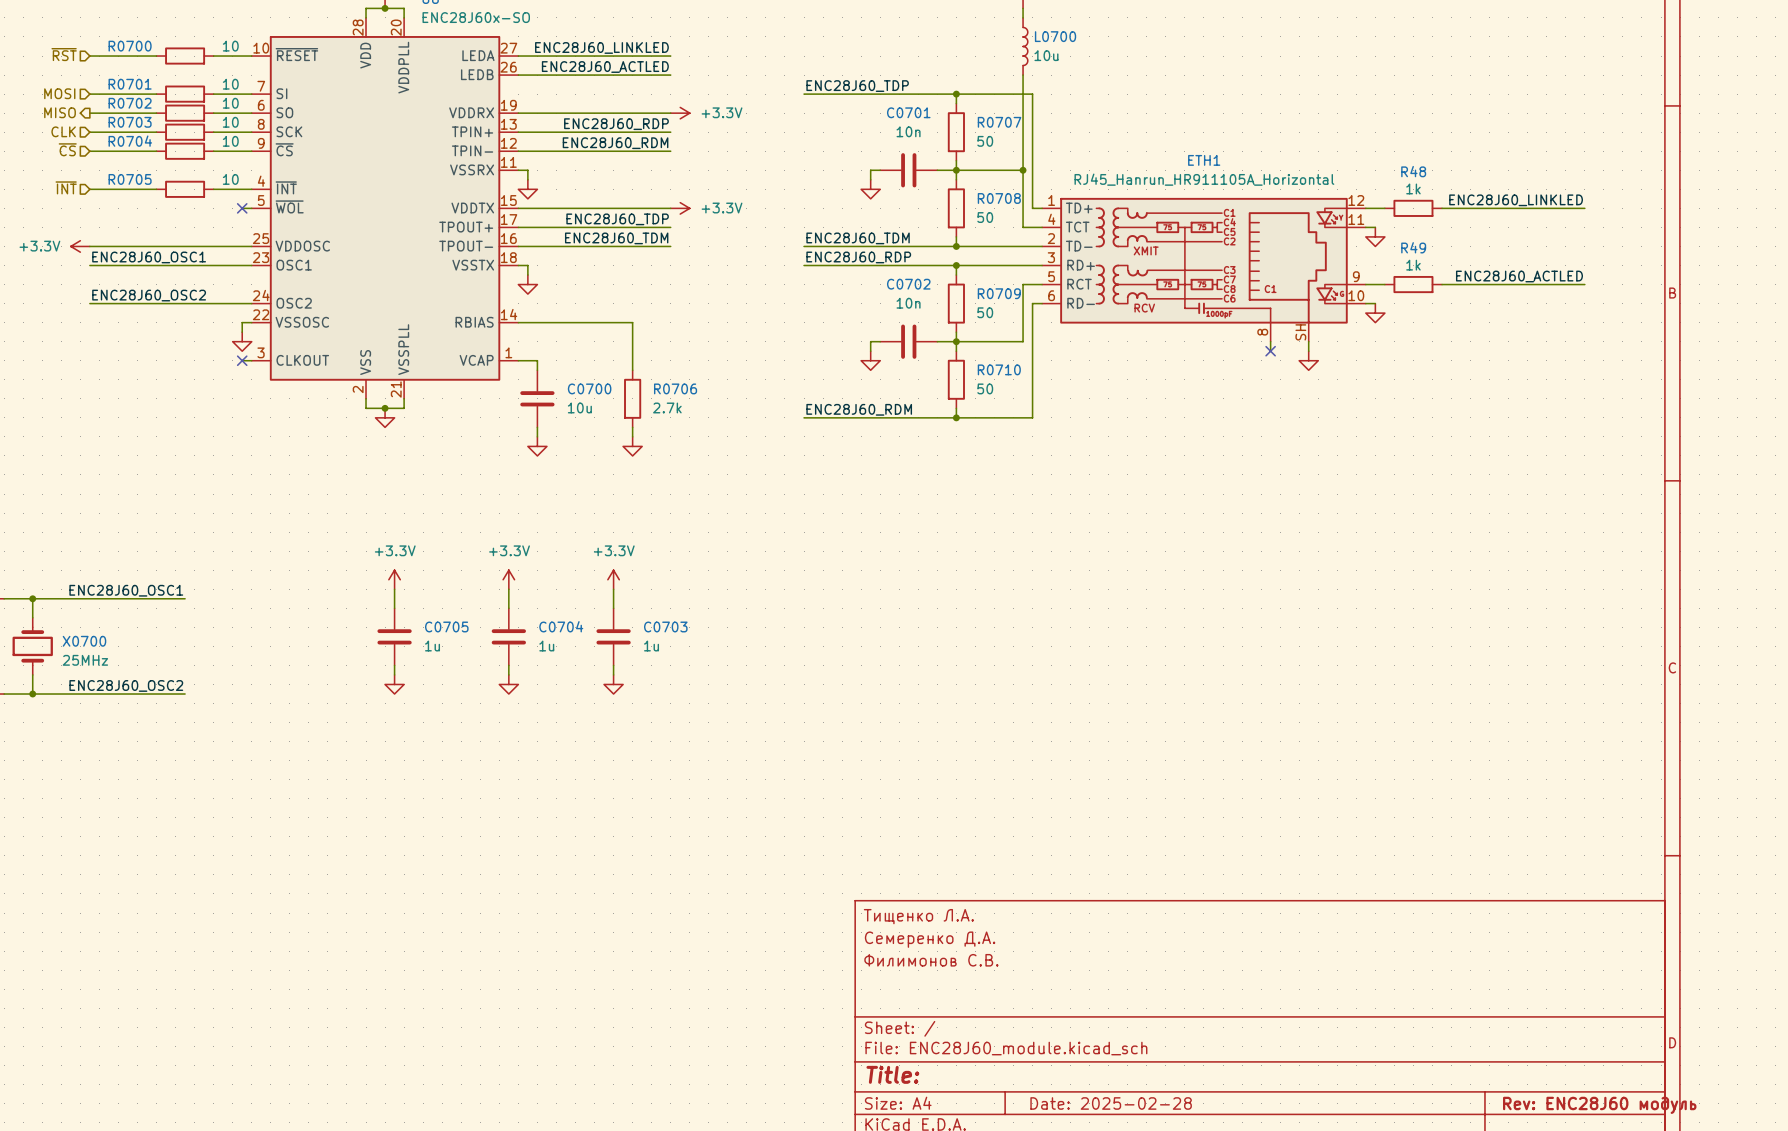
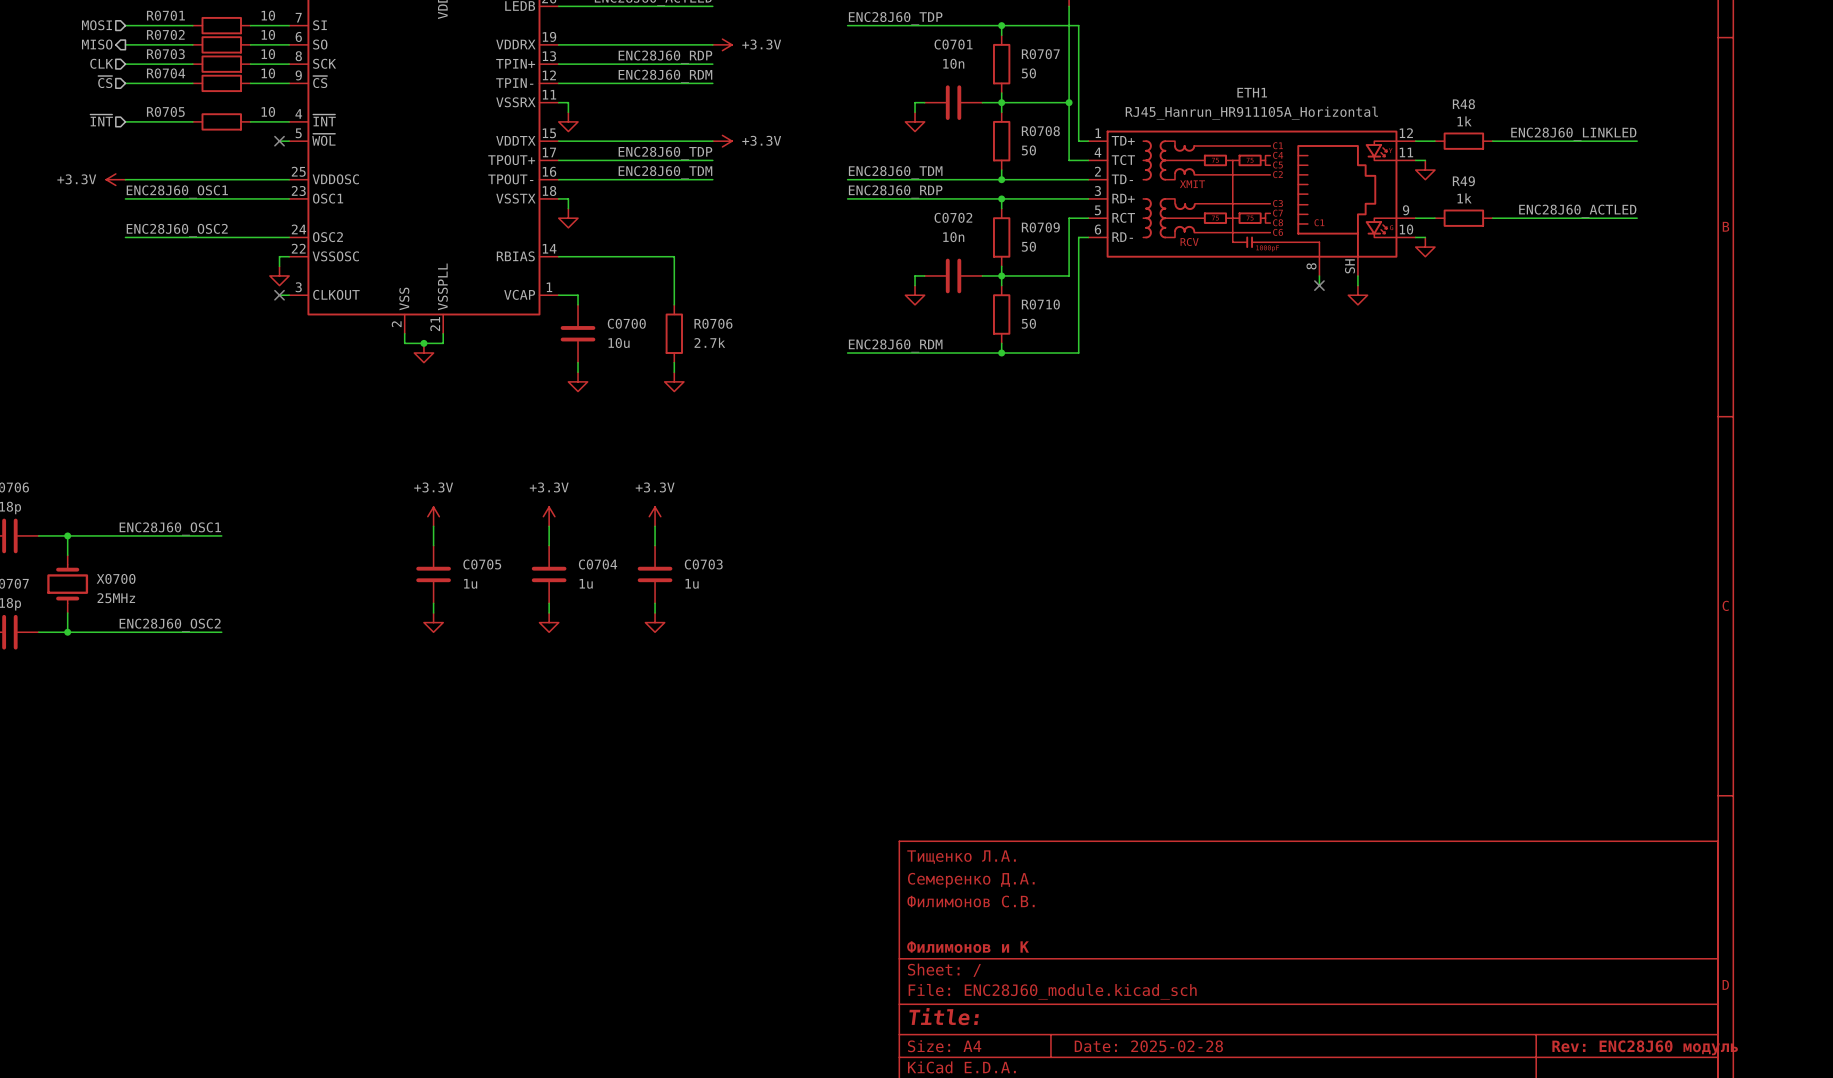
title block: none -> Филимонов и К (968, 947)

